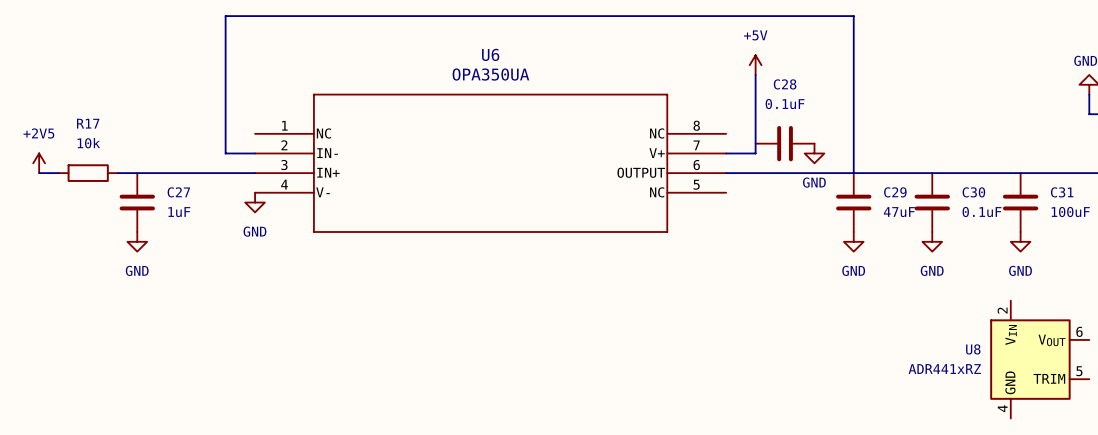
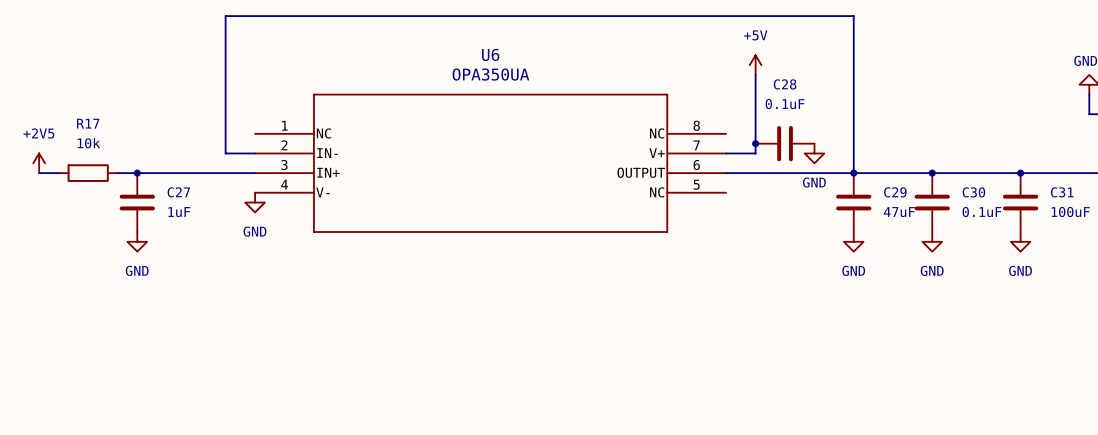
junction: none -> (755, 143)
junction: none -> (137, 173)
junction: none -> (853, 173)
junction: none -> (932, 173)
junction: none -> (1020, 173)
U8: ADR441xRZ (1039, 359) -> none

